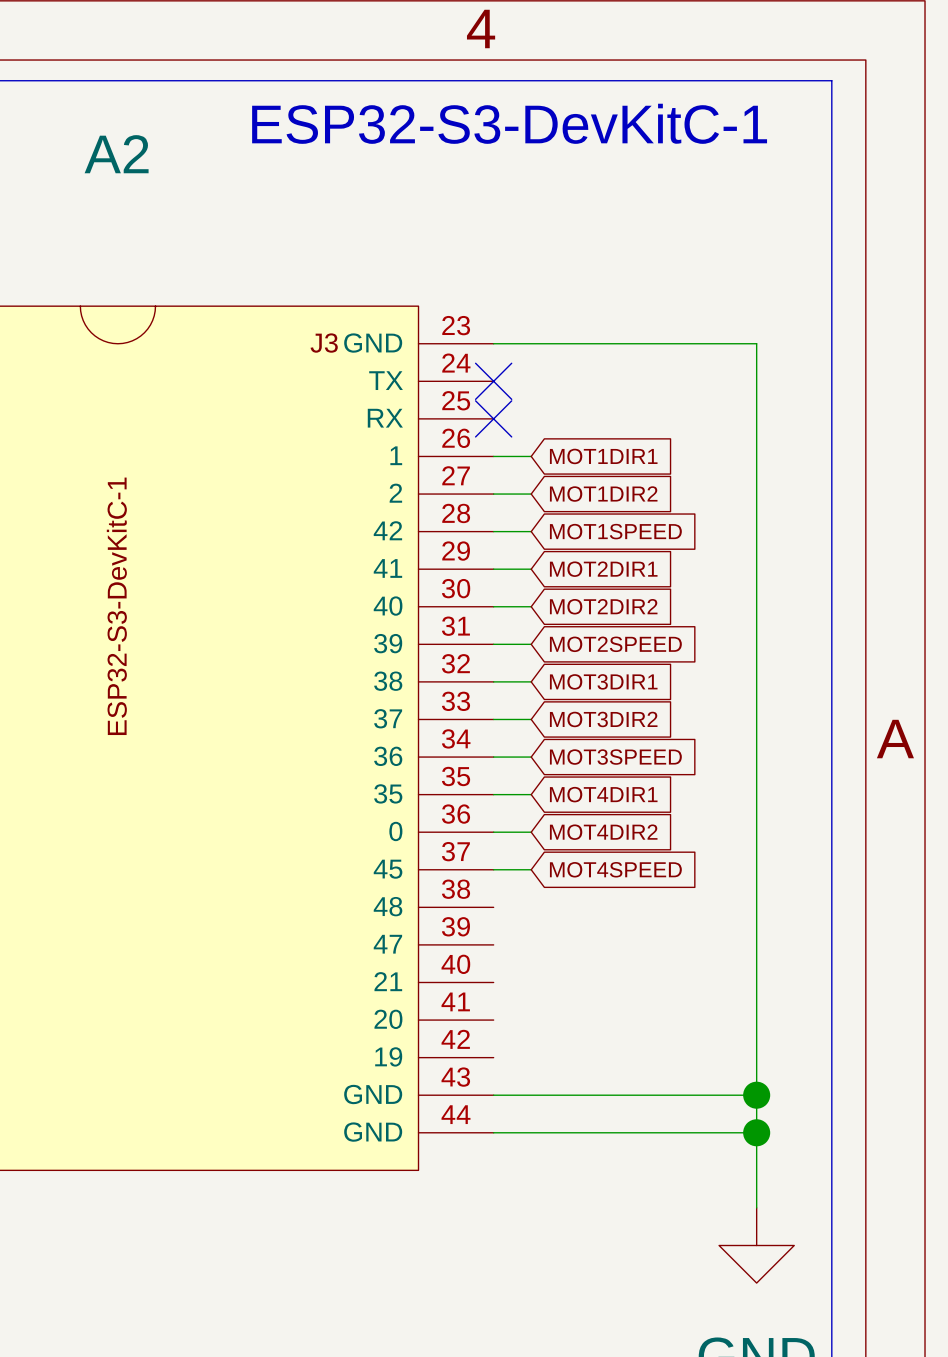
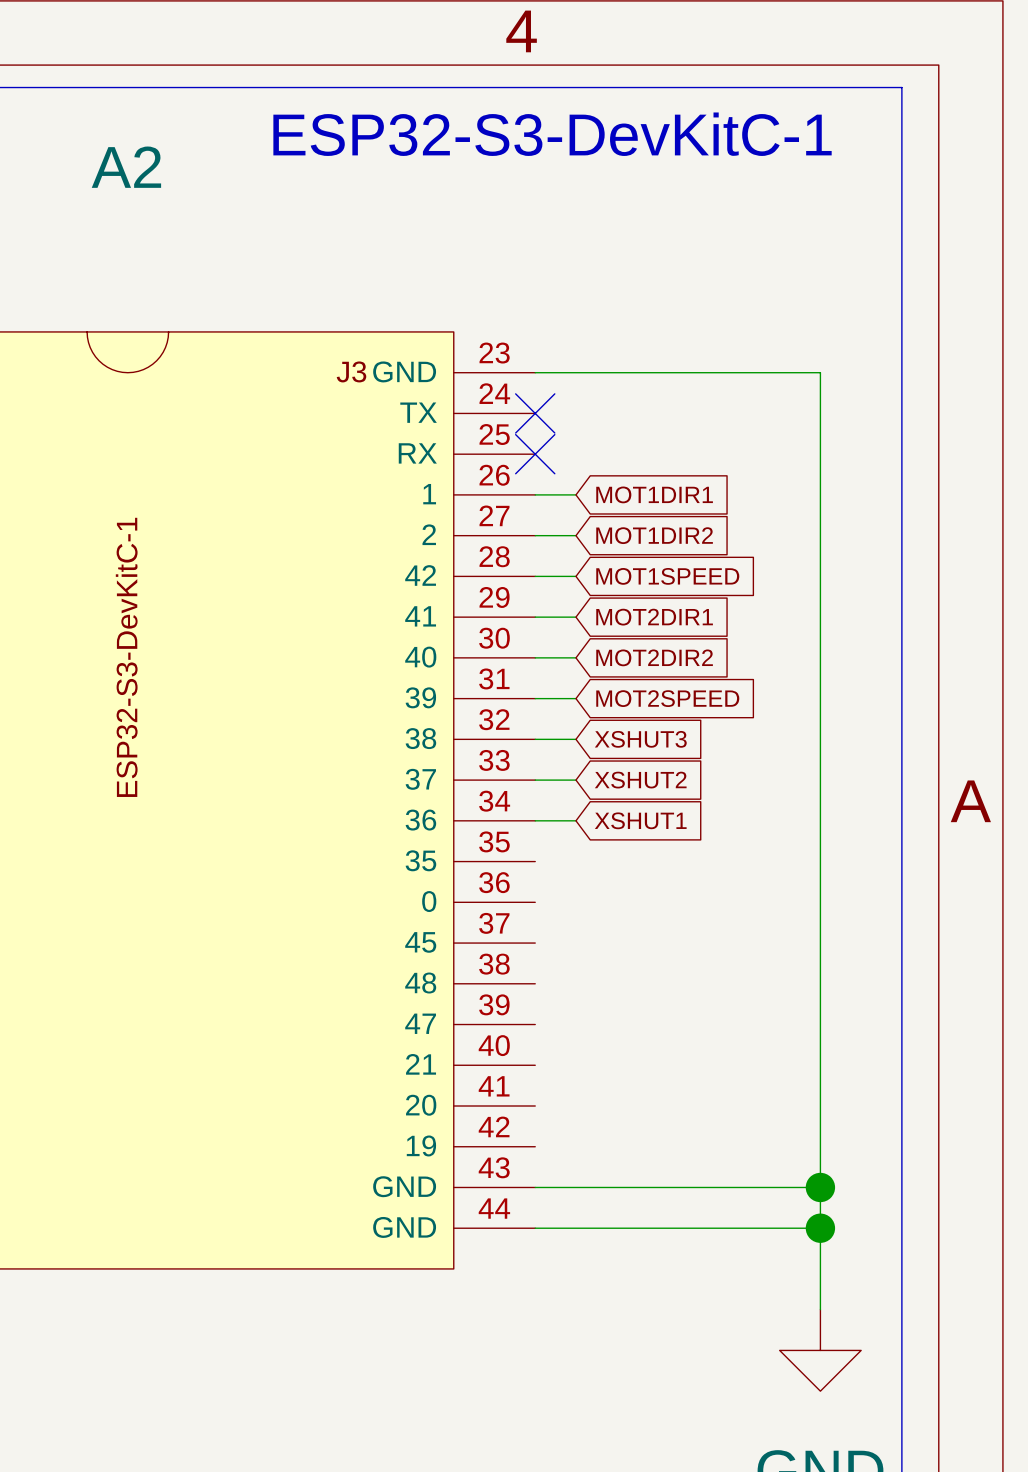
global label: MOT3DIR1 (603, 681) -> XSHUT3 (640, 739)
global label: MOT3DIR2 (603, 719) -> XSHUT2 (640, 780)
global label: MOT3SPEED (615, 757) -> XSHUT1 (640, 820)
wire: (493, 794) (531, 794) -> none
global label: MOT4DIR1 (603, 794) -> none
wire: (493, 832) (531, 832) -> none
global label: MOT4DIR2 (603, 832) -> none
wire: (493, 869) (531, 869) -> none
global label: MOT4SPEED (615, 869) -> none

